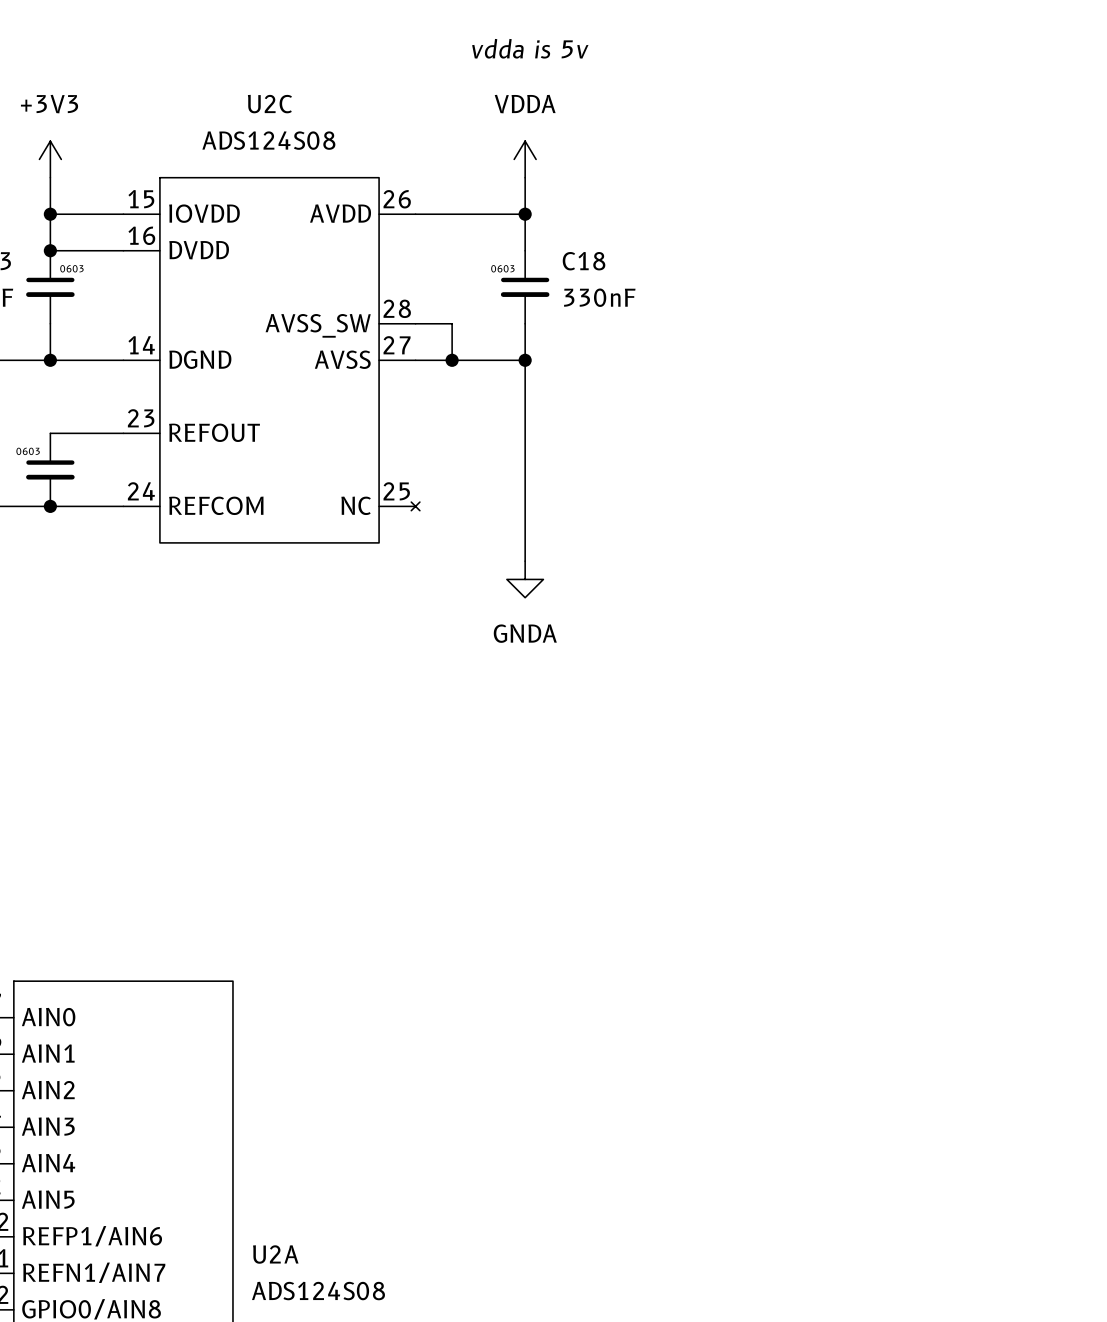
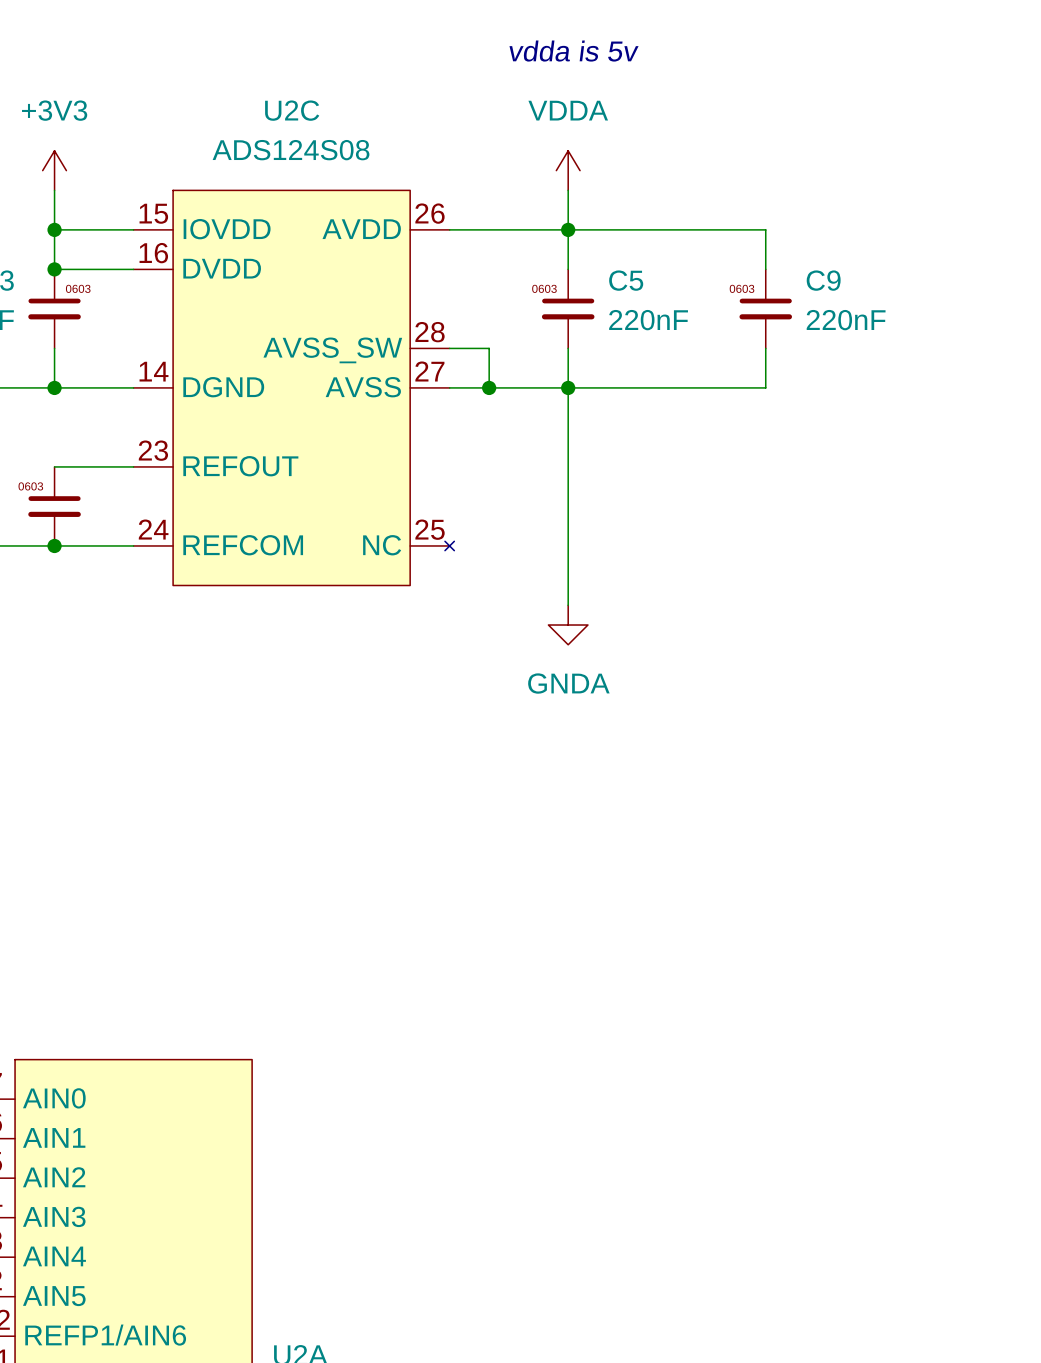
wire: none -> (568, 229) (765, 229) (765, 269)
C18 name: C18 (584, 261) -> C5 (626, 280)
C9: none -> 220nF (765, 308)
C18 value: 330nF (599, 297) -> 220nF (648, 320)
wire: none -> (765, 348) (765, 387) (568, 387)

